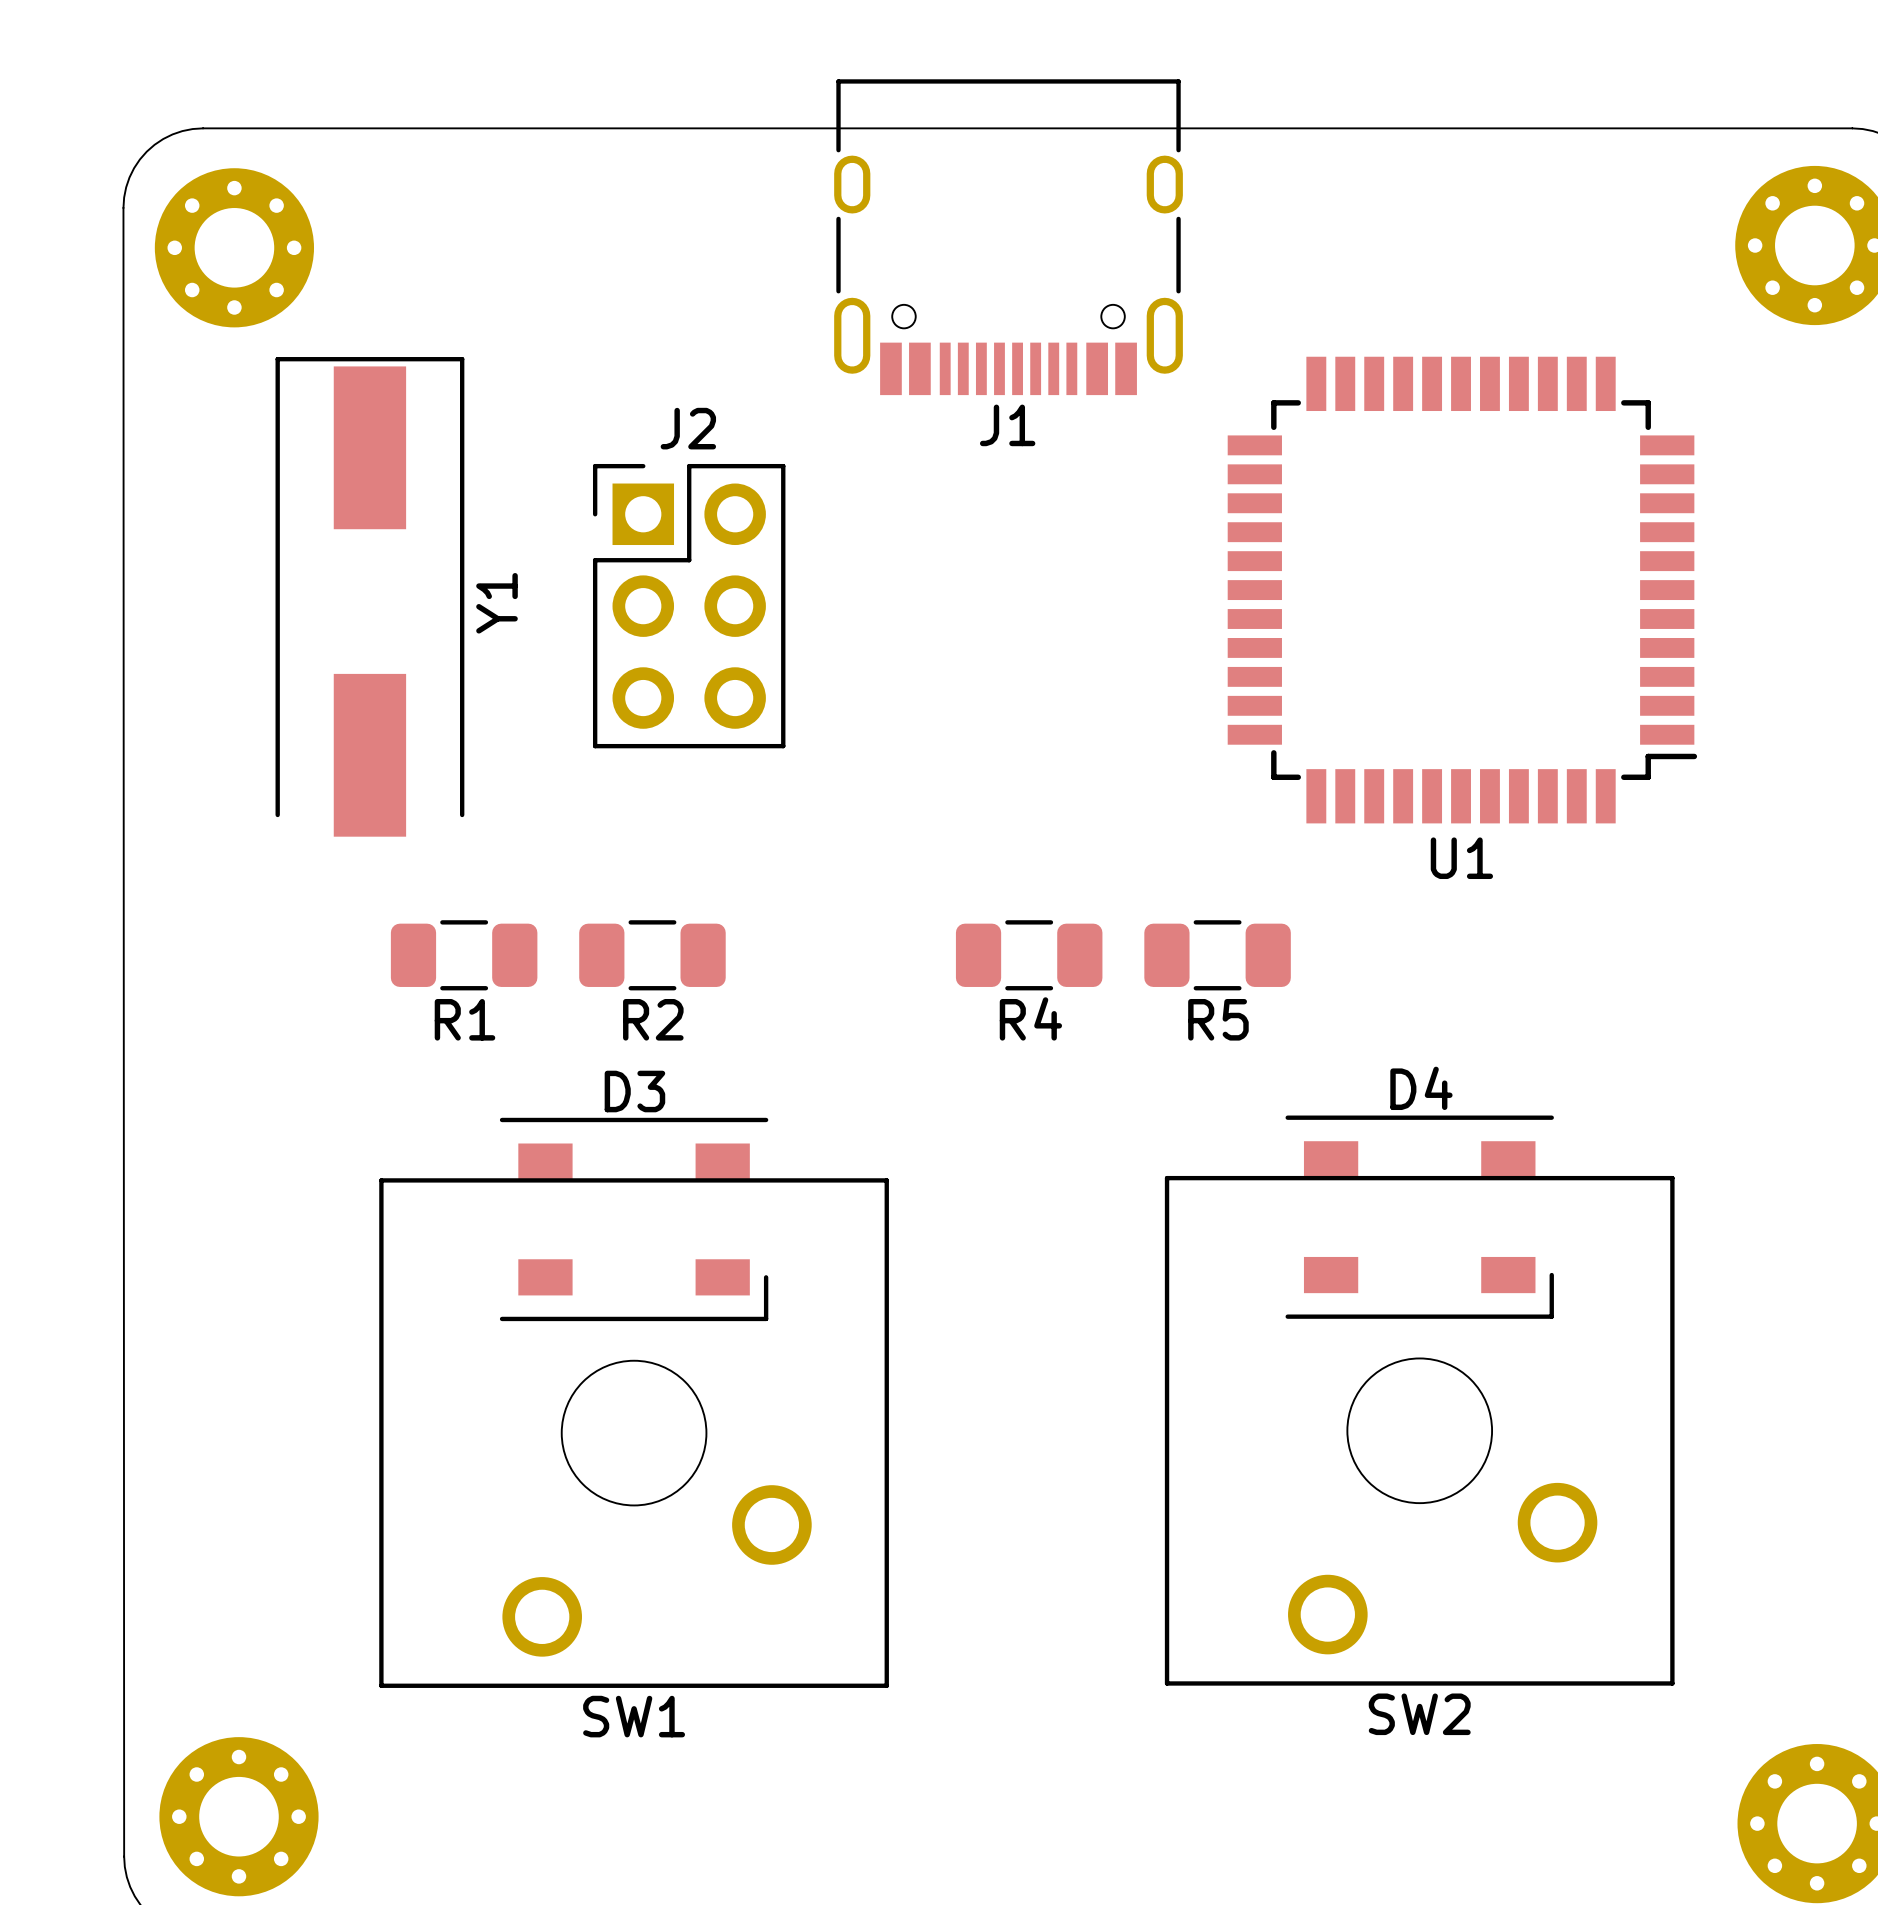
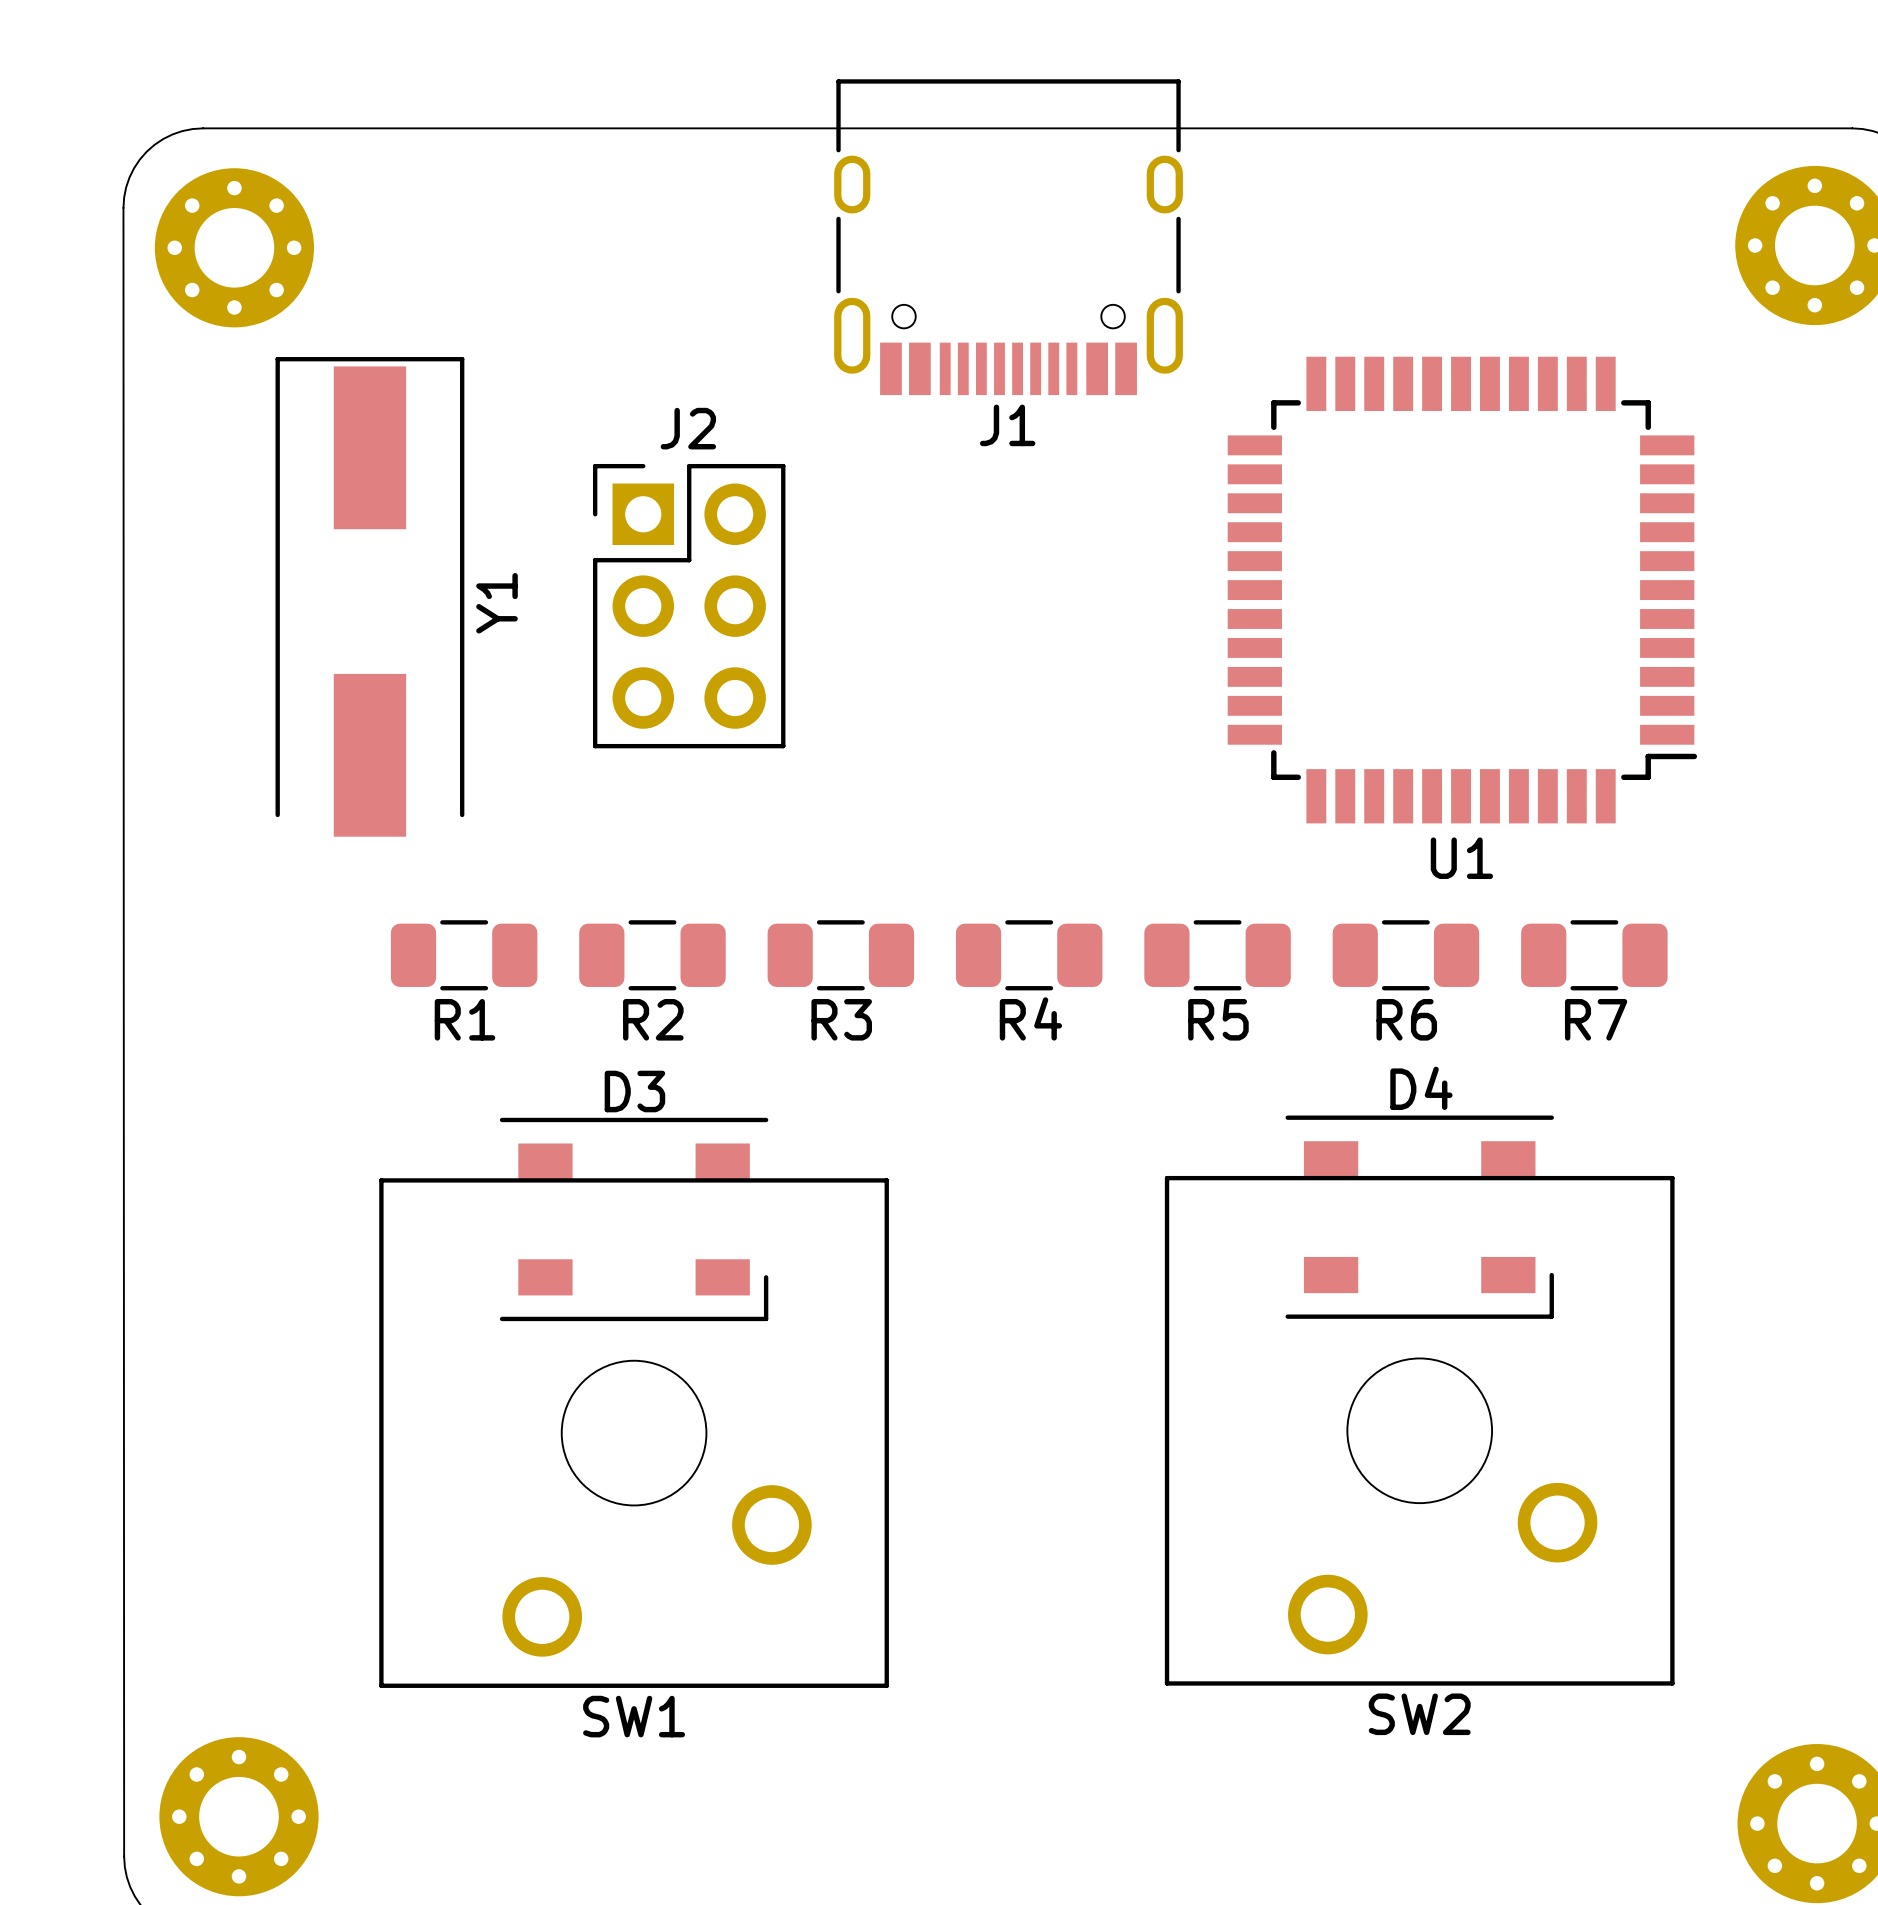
R3: none -> (840, 955)
R6: none -> (1405, 955)
R7: none -> (1594, 955)

